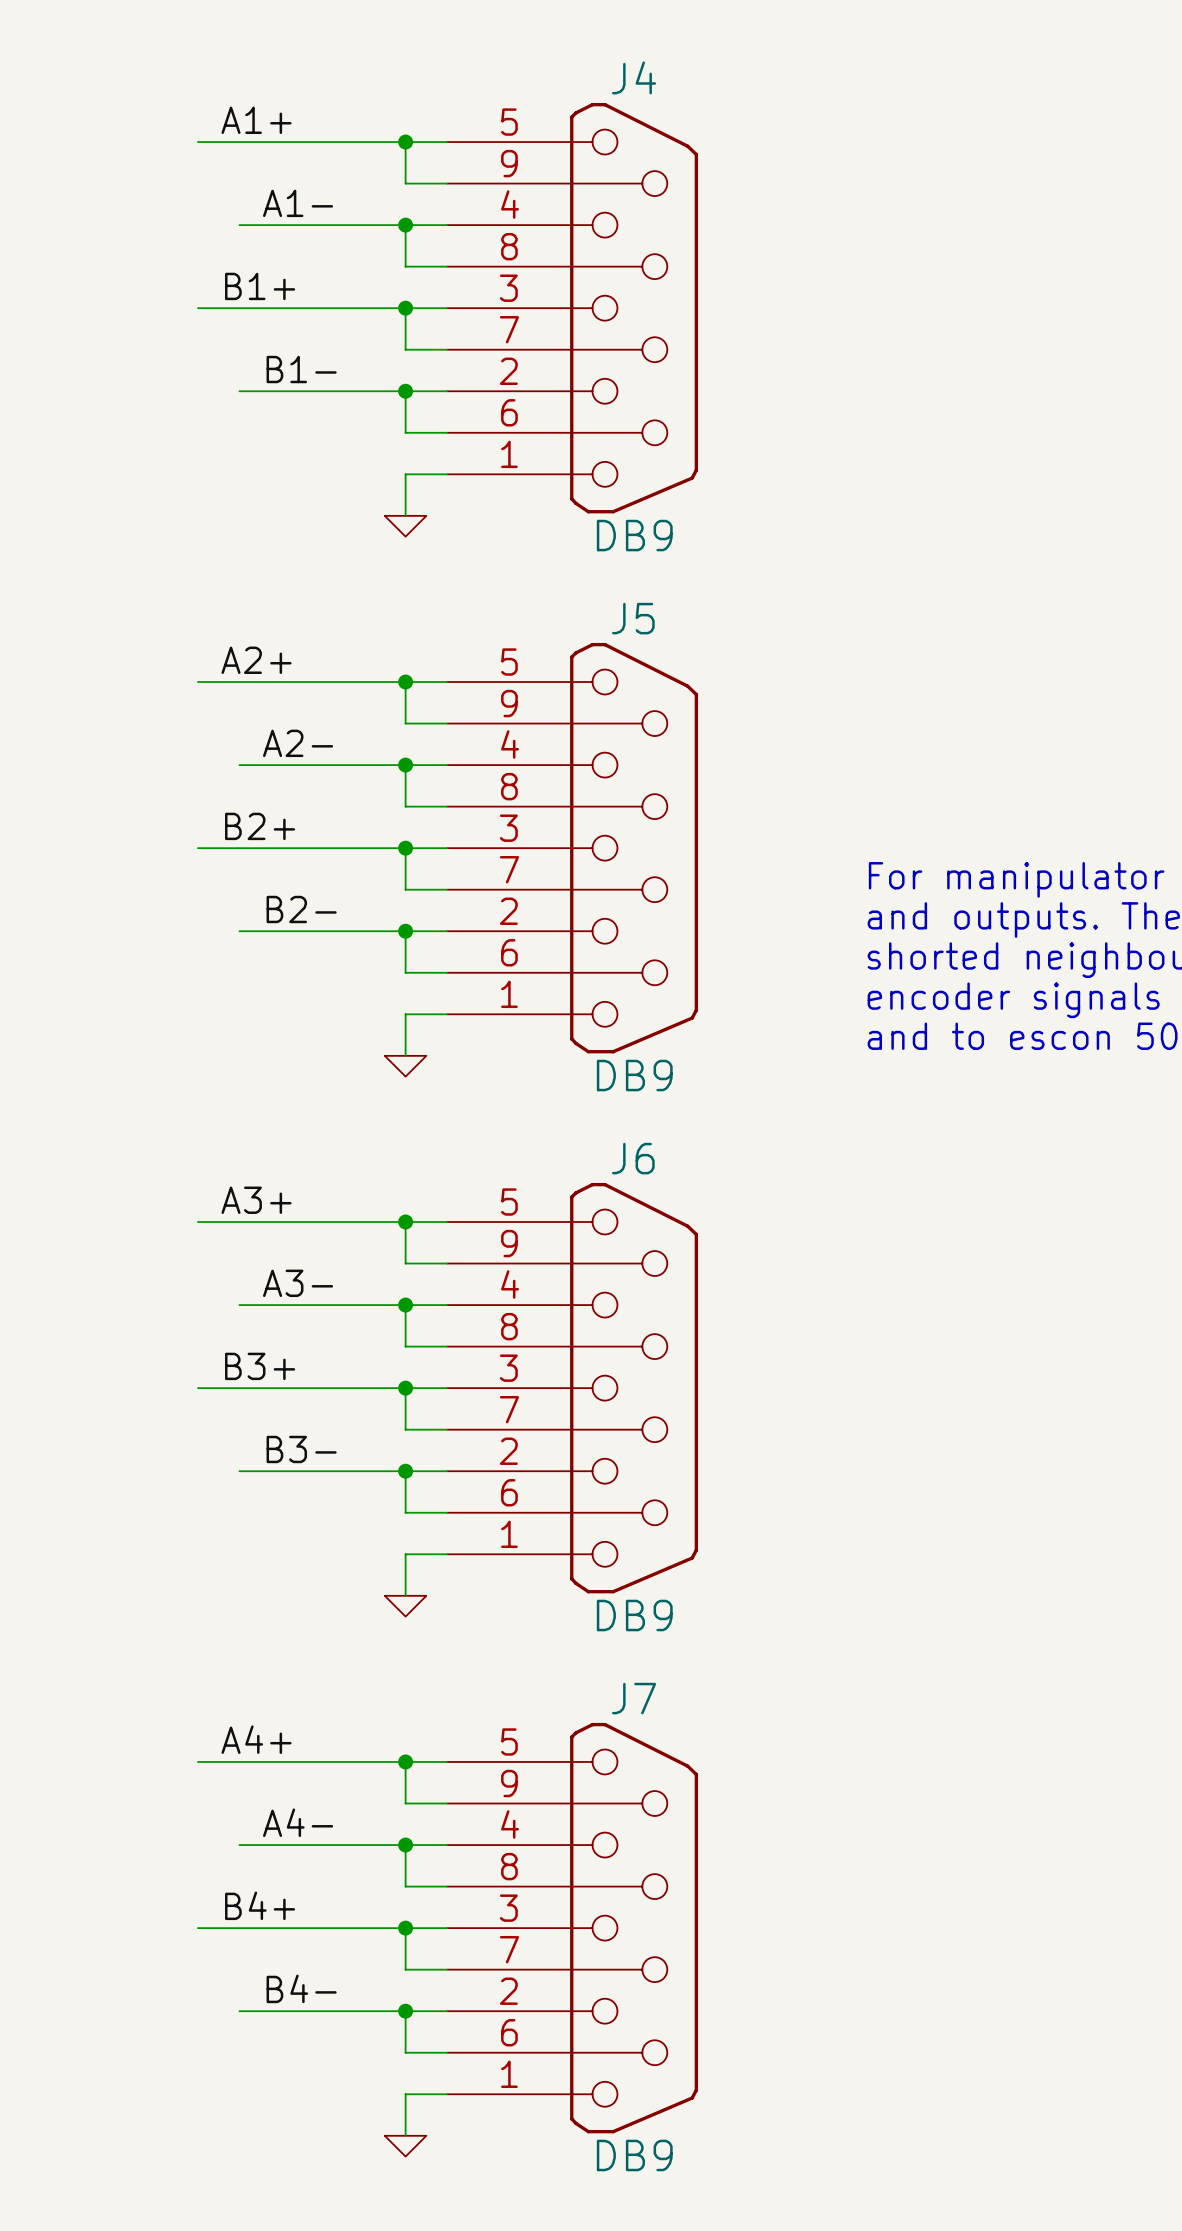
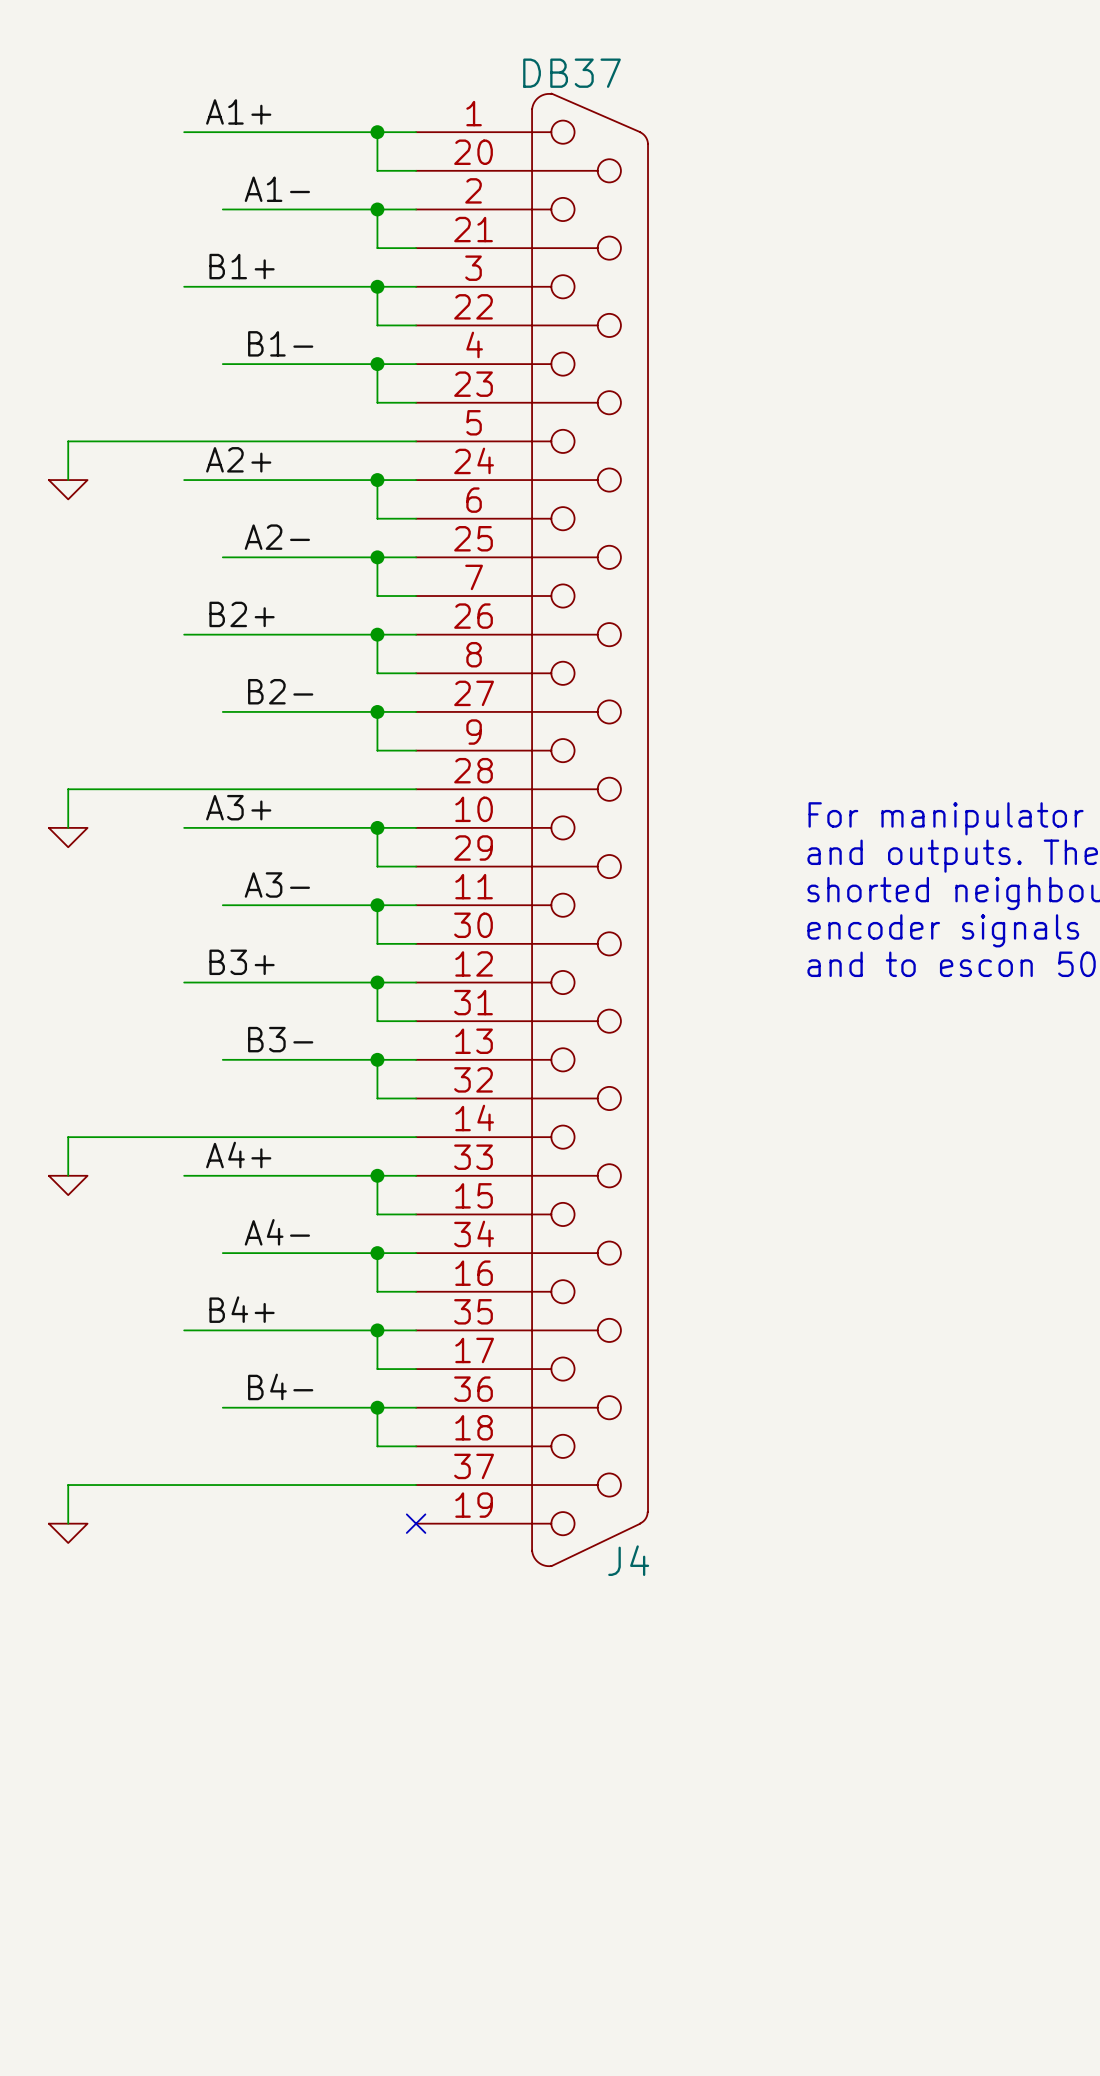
J4 name position: J4 (634, 77) -> J4 (628, 1560)
J4 symbol: [447, 102, 699, 514] -> [416, 93, 649, 1567]
wire: (405, 474) (405, 515) -> (416, 518) (377, 518) (377, 480)
wire: none -> (377, 441) (68, 441) (68, 480)
label: none -> A2+ (238, 459)
wire: none -> (184, 480) (416, 480)
junction: none -> (377, 480)
power symbol: none -> (68, 489)
power symbol: (405, 526) -> none
J4 value: DB9 (634, 535) -> DB37 (571, 73)
label: none -> A2- (277, 537)
wire: none -> (222, 557) (416, 557)
wire: none -> (377, 557) (377, 596) (416, 596)
junction: none -> (377, 557)
label: A2+ (256, 660) -> B2+ (242, 614)
label: A2- (298, 743) -> B2- (280, 691)
label: B2+ (260, 826) -> none
wire: none -> (184, 789) (68, 789) (68, 827)
wire: (405, 848) (405, 889) -> none
junction: (405, 848) -> none
J5: DB9 (572, 848) -> none
wire: none -> (184, 827) (377, 827) (377, 866)
junction: none -> (377, 827)
power symbol: none -> (68, 837)
label: B2- (301, 909) -> none
wire: (239, 931) (405, 931) (405, 972) -> (222, 905) (377, 905) (377, 943)
junction: (405, 931) -> none
junction: none -> (377, 905)
wire: (405, 1014) (405, 1055) -> (416, 1021) (377, 1021) (377, 982)
wire: none -> (184, 982) (416, 982)
junction: none -> (377, 982)
power symbol: (405, 1066) -> none
wire: none -> (222, 1059) (416, 1059)
wire: none -> (377, 1059) (377, 1098) (416, 1098)
junction: none -> (377, 1059)
label position: A3+ (256, 1200) -> A3+ (238, 807)
wire: none -> (184, 1137) (68, 1137) (68, 1175)
wire: (405, 1221) (405, 1263) -> none
junction: (405, 1221) -> none
label: none -> A4+ (238, 1155)
wire: none -> (184, 1175) (377, 1175) (377, 1214)
junction: none -> (377, 1175)
power symbol: none -> (68, 1185)
label position: A3- (298, 1283) -> A3- (277, 884)
wire: (239, 1305) (405, 1305) (405, 1346) -> (222, 1253) (377, 1253) (377, 1291)
junction: (405, 1305) -> none
label: none -> A4- (277, 1232)
junction: none -> (377, 1253)
label position: B3+ (260, 1366) -> B3+ (242, 962)
wire: (197, 1388) (405, 1388) (405, 1429) -> (184, 1330) (377, 1330) (377, 1369)
junction: (405, 1388) -> none
J6: DB9 (572, 1388) -> none
label: none -> B4+ (242, 1309)
junction: none -> (377, 1330)
label position: B3- (301, 1449) -> B3- (280, 1039)
wire: (239, 1471) (405, 1471) (405, 1512) -> none
junction: (405, 1471) -> none
label: none -> B4- (280, 1386)
junction: none -> (377, 1407)
wire: (405, 1554) (405, 1595) -> (377, 1446) (377, 1407) (222, 1407)
wire: none -> (416, 1485) (68, 1485) (68, 1523)
power symbol: (405, 1606) -> none
no-connect mark: none -> (416, 1523)
power symbol: none -> (68, 1533)
label: A4+ (256, 1739) -> none
wire: (197, 1761) (447, 1761) -> none
wire: (405, 1761) (405, 1803) (447, 1803) -> none
junction: (405, 1761) -> none
label: A4- (298, 1822) -> none
wire: (239, 1845) (447, 1845) -> none
wire: (405, 1845) (405, 1886) (447, 1886) -> none
junction: (405, 1845) -> none
label: B4+ (260, 1905) -> none
wire: (197, 1928) (447, 1928) -> none
wire: (405, 1928) (405, 1969) (447, 1969) -> none
junction: (405, 1928) -> none
J7: DB9 (572, 1928) -> none
label: B4- (301, 1988) -> none
wire: (239, 2011) (447, 2011) -> none
wire: (405, 2011) (405, 2052) (447, 2052) -> none
junction: (405, 2011) -> none
wire: (447, 2094) (405, 2094) (405, 2135) -> none
power symbol: (405, 2146) -> none

